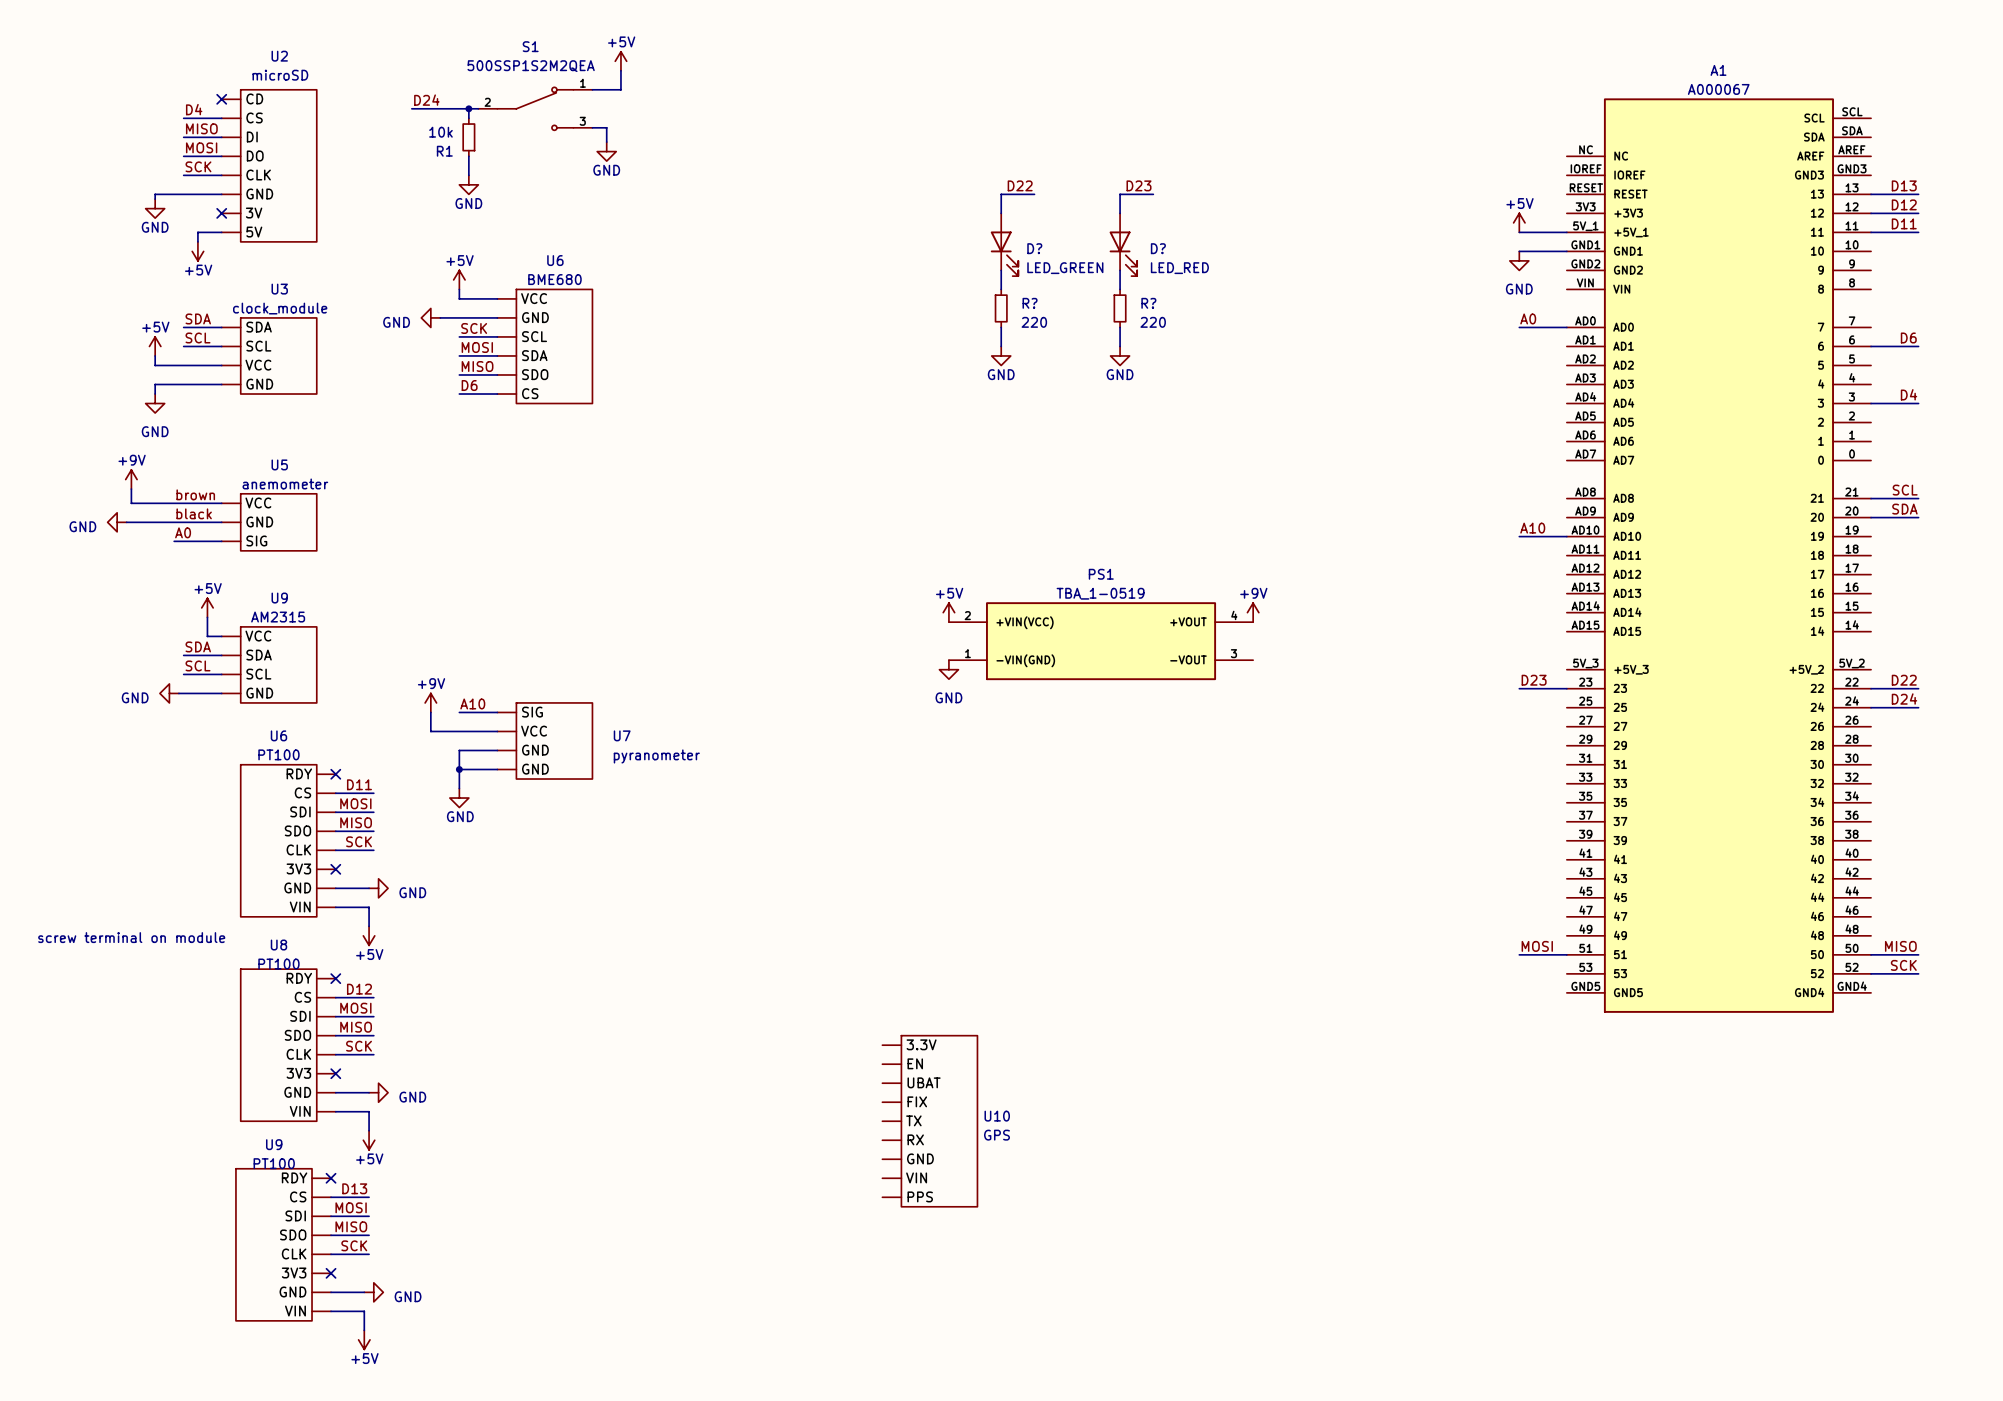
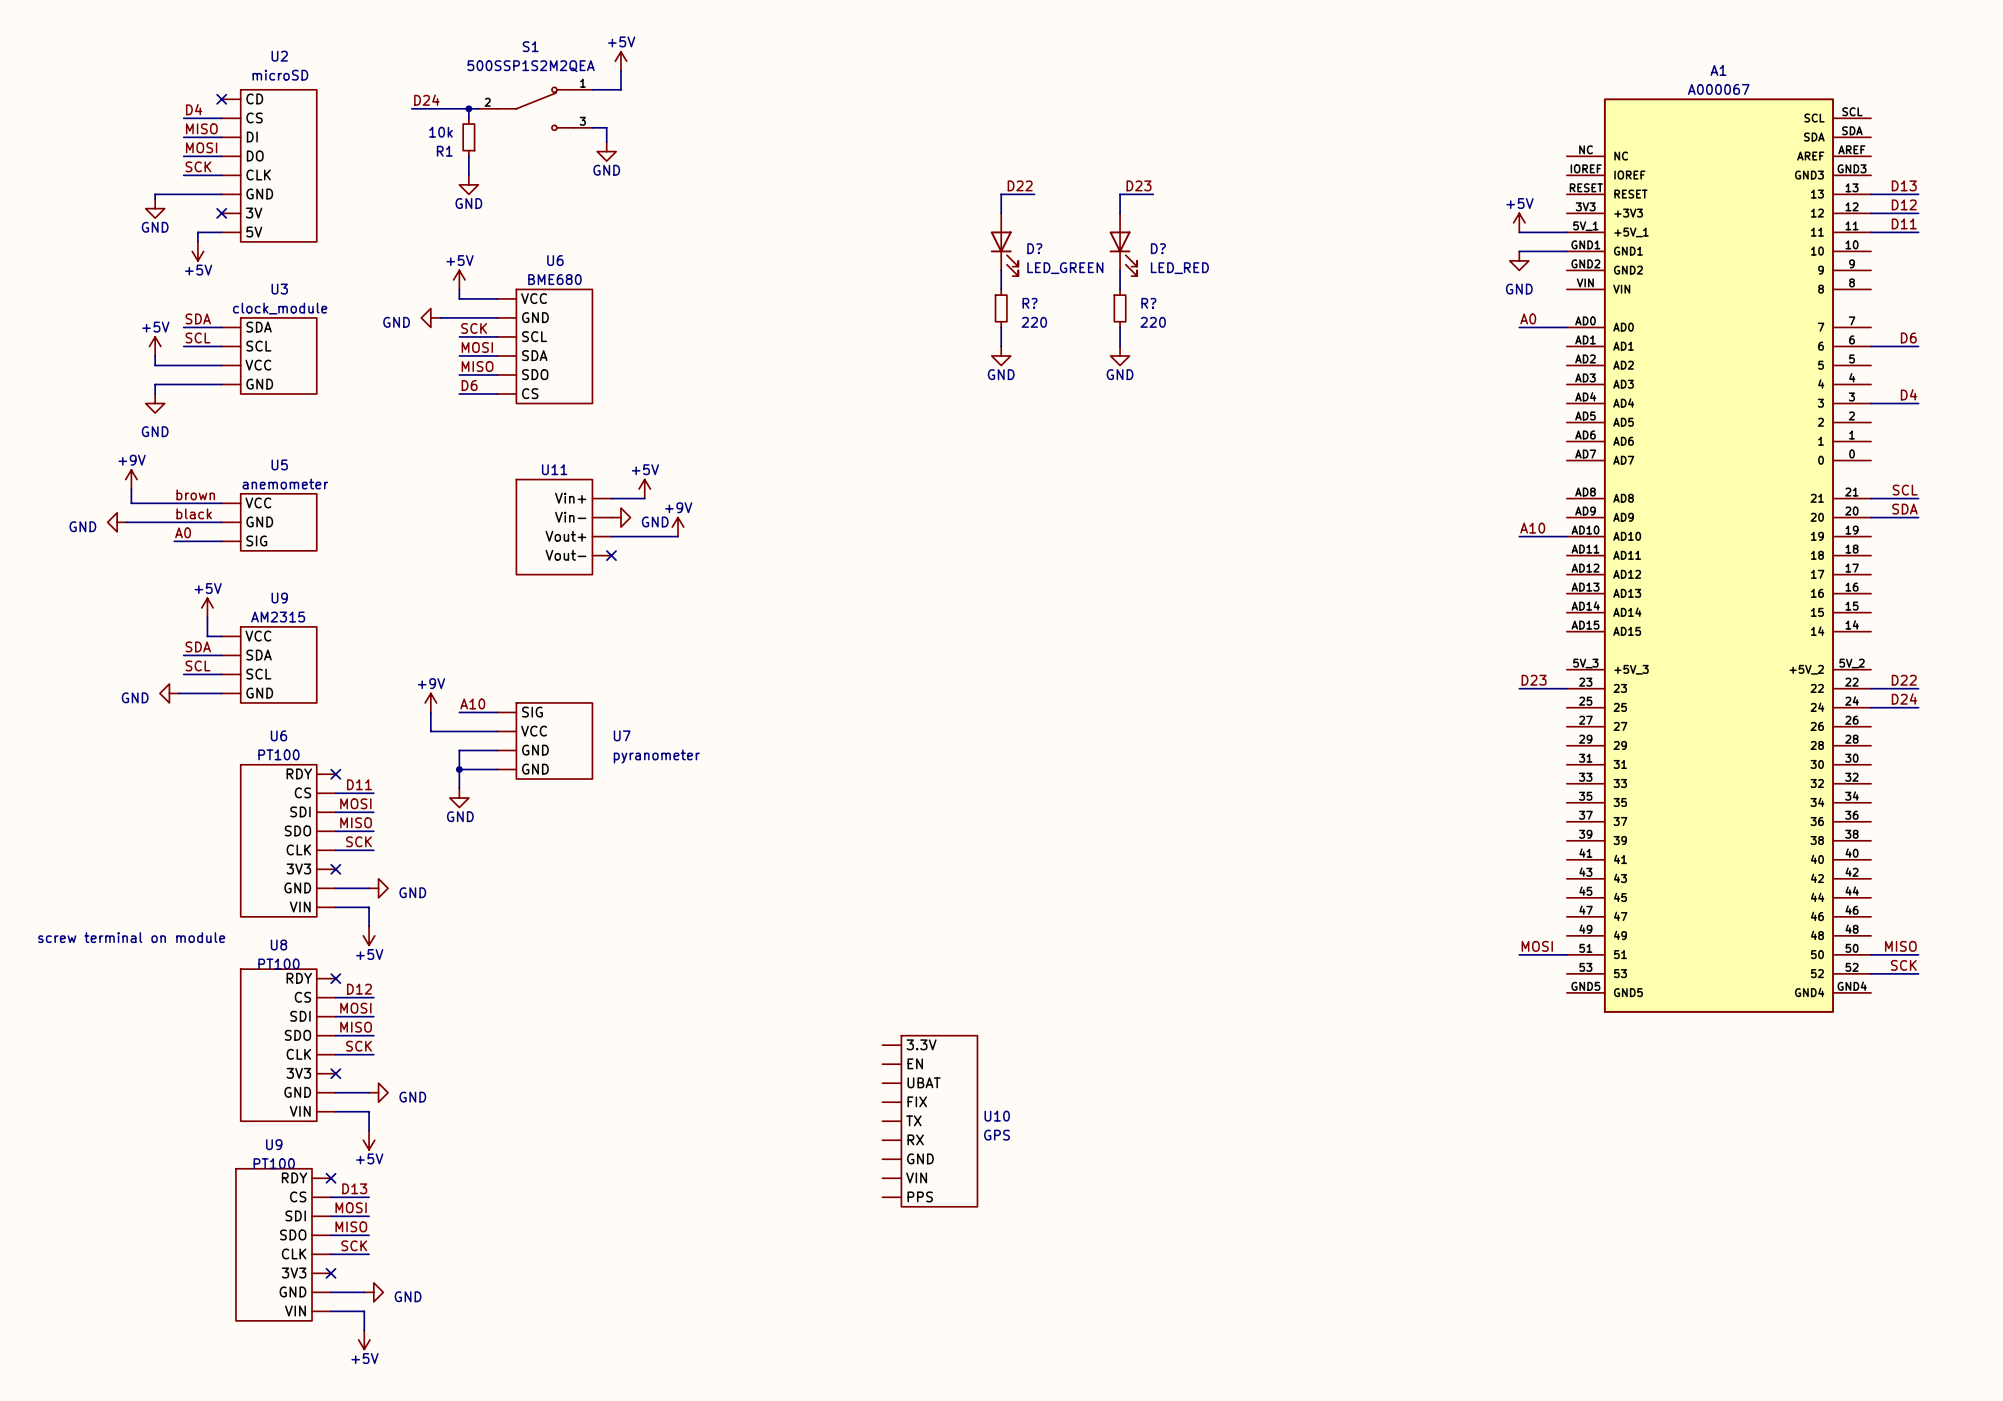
power symbol: none -> +5V (644, 489)
wire: none -> (611, 498) (644, 498)
power symbol: none -> GND (620, 517)
U11: none -> (563, 527)
power symbol: none -> +9V (678, 527)
wire: none -> (611, 536) (678, 536)
no-connect mark: none -> (611, 555)
power symbol: +5V (948, 612) -> none
power symbol: +9V (1253, 612) -> none
PS1: TBA_1-0519 (1101, 641) -> none
power symbol: GND (948, 669) -> none

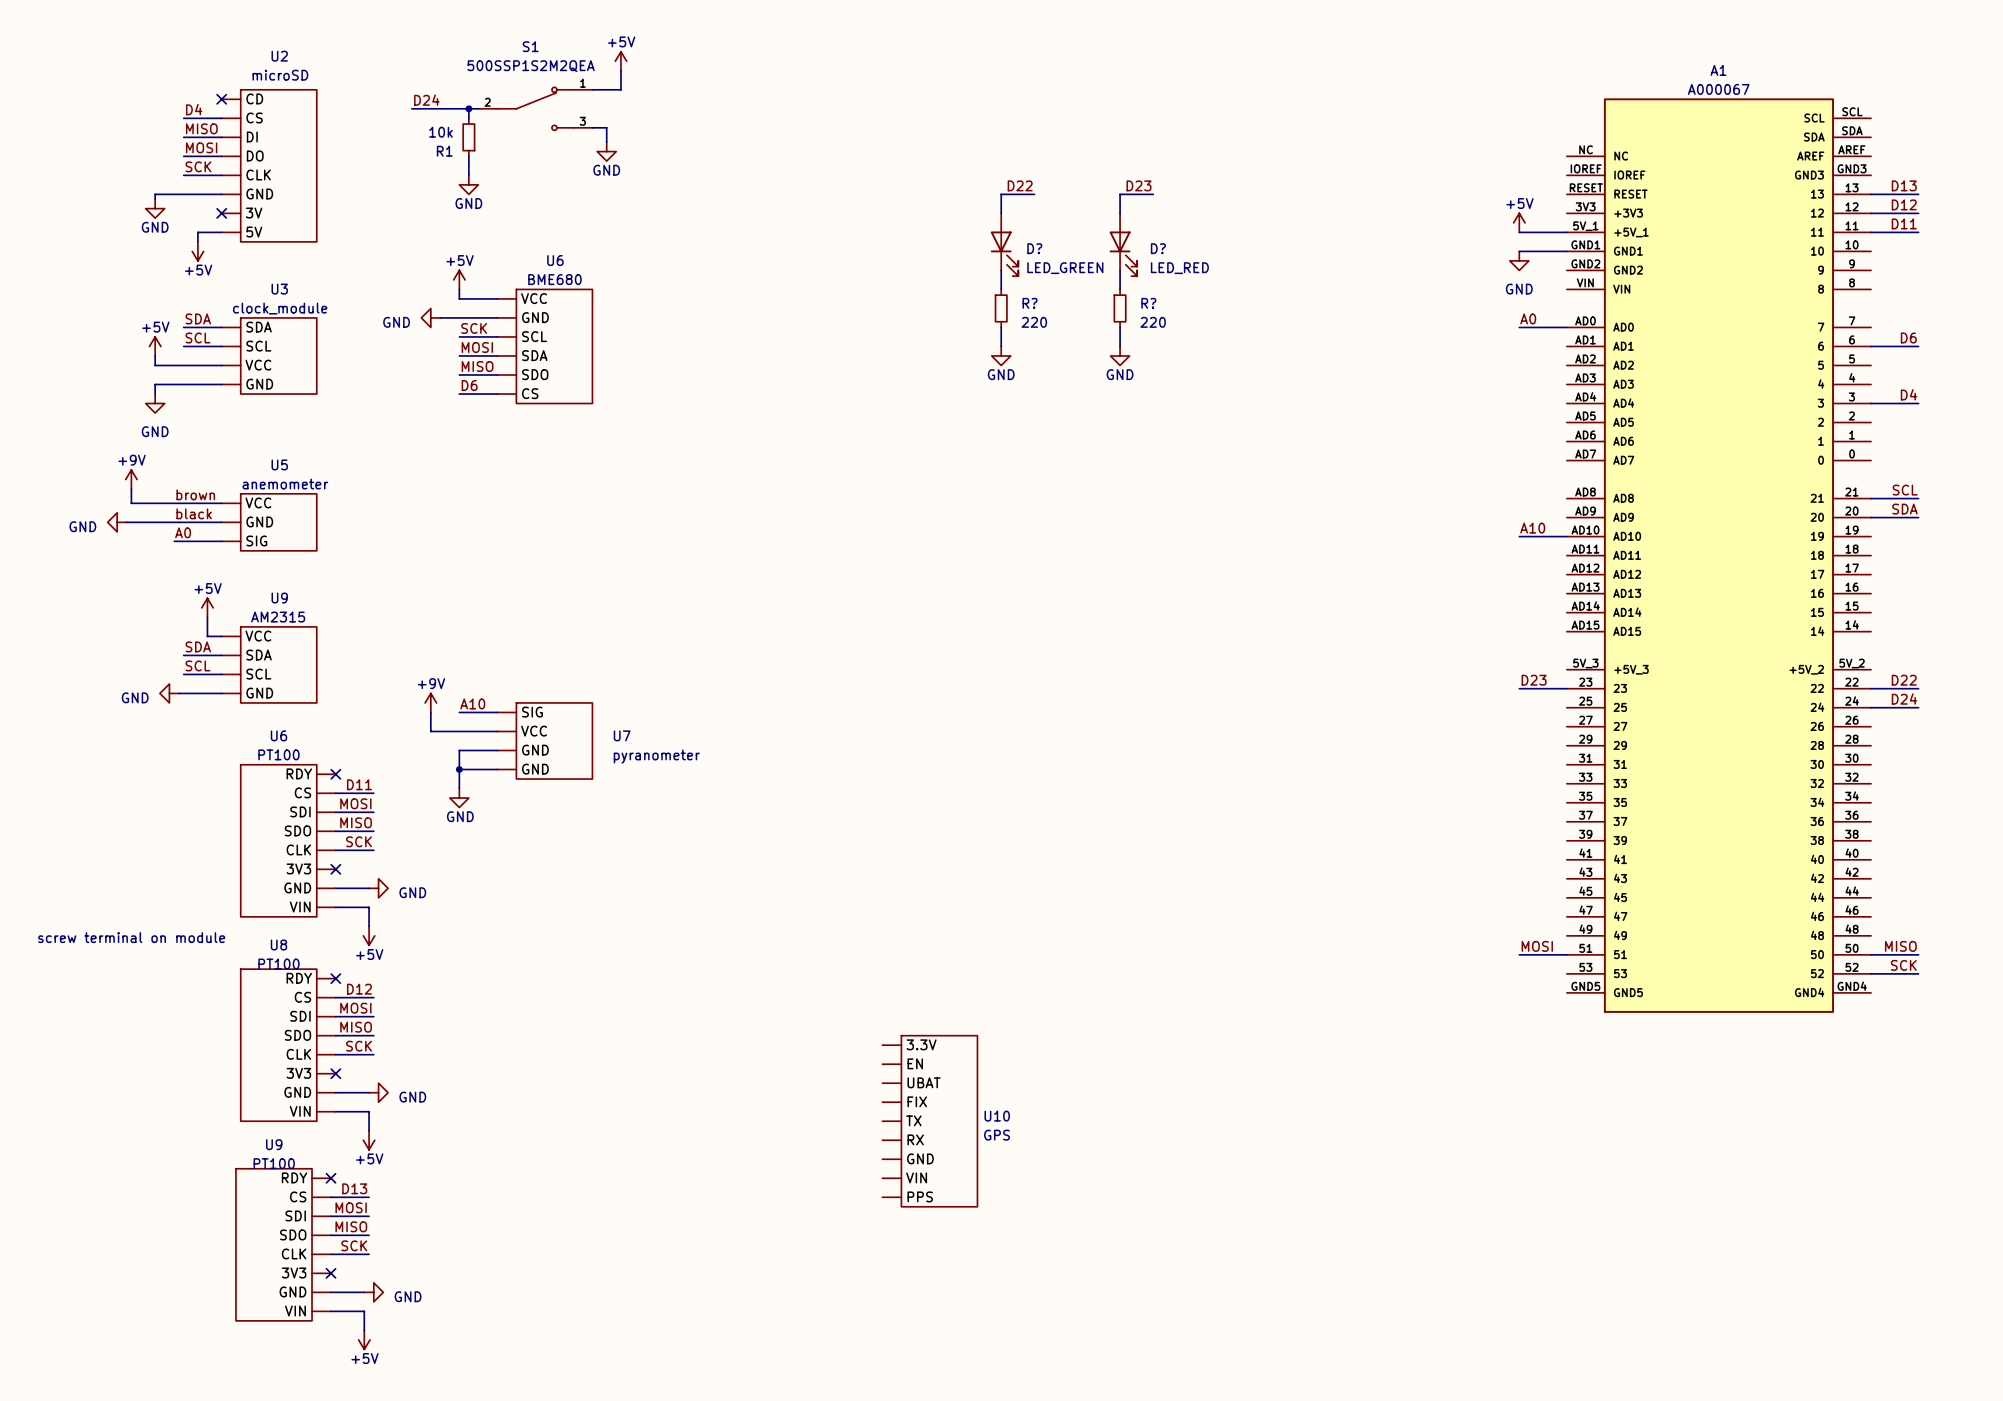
power symbol: +5V (644, 489) -> none
wire: (611, 498) (644, 498) -> none
power symbol: GND (620, 517) -> none
U11: (563, 527) -> none
power symbol: +9V (678, 527) -> none
wire: (611, 536) (678, 536) -> none
no-connect mark: (611, 555) -> none

